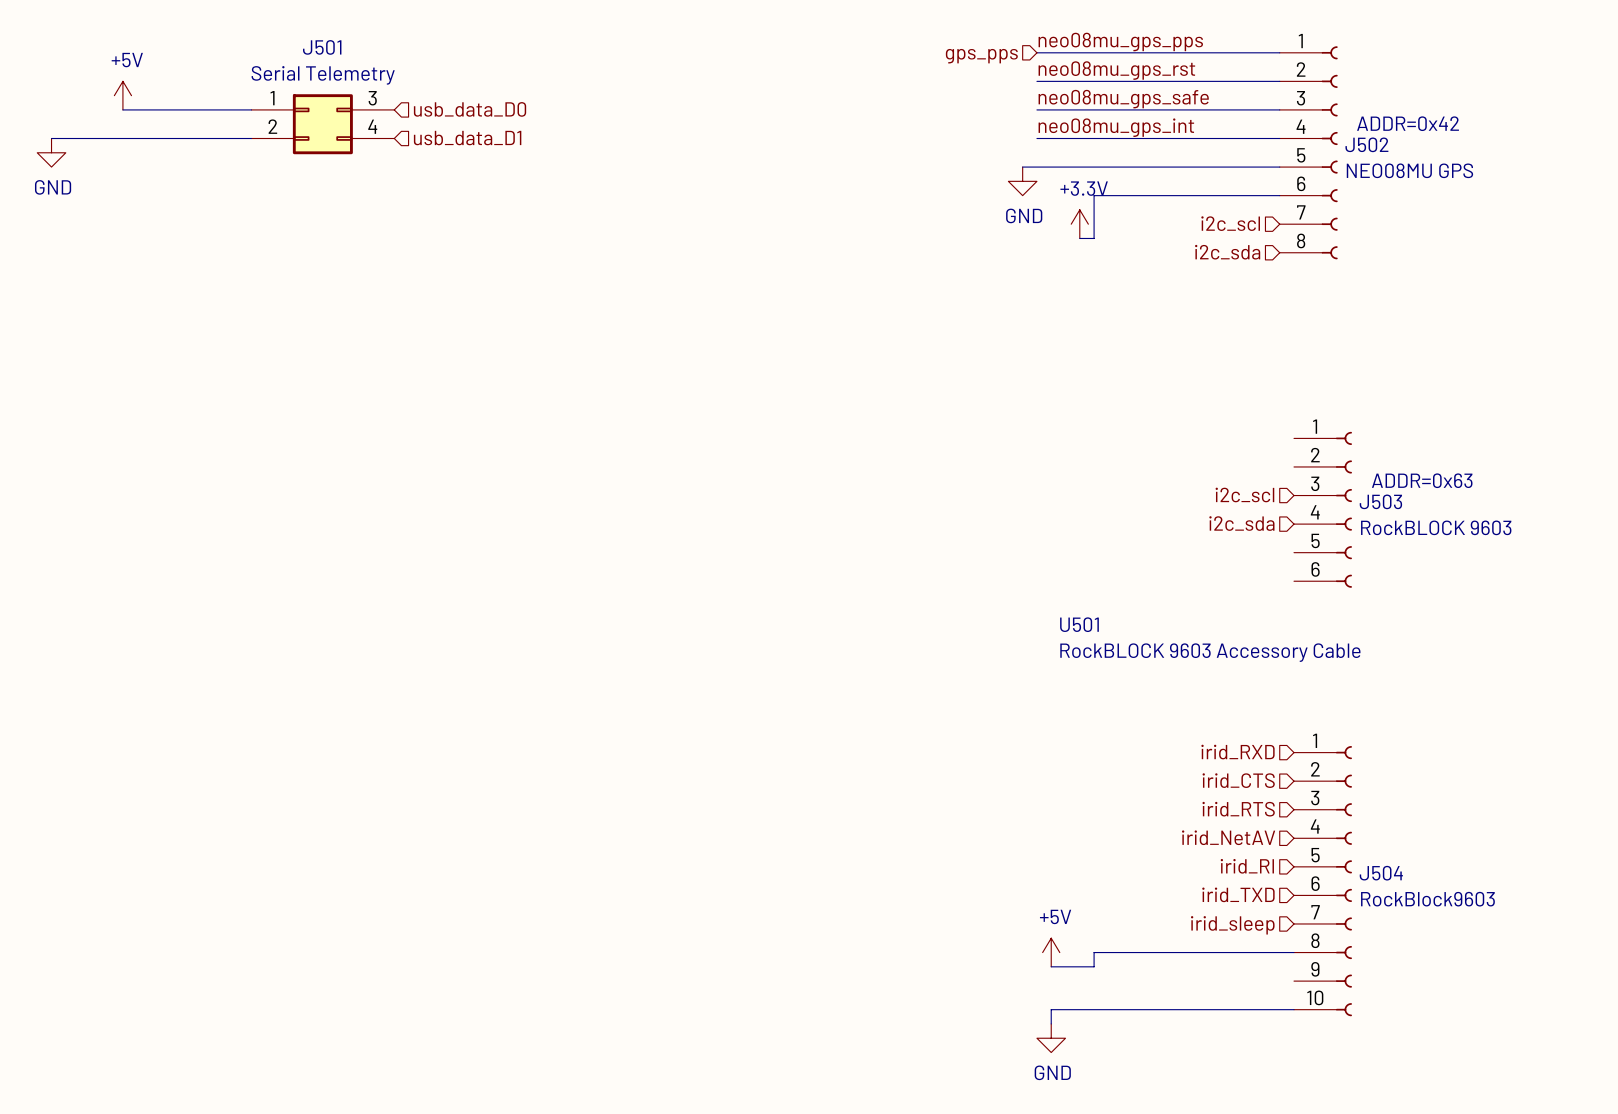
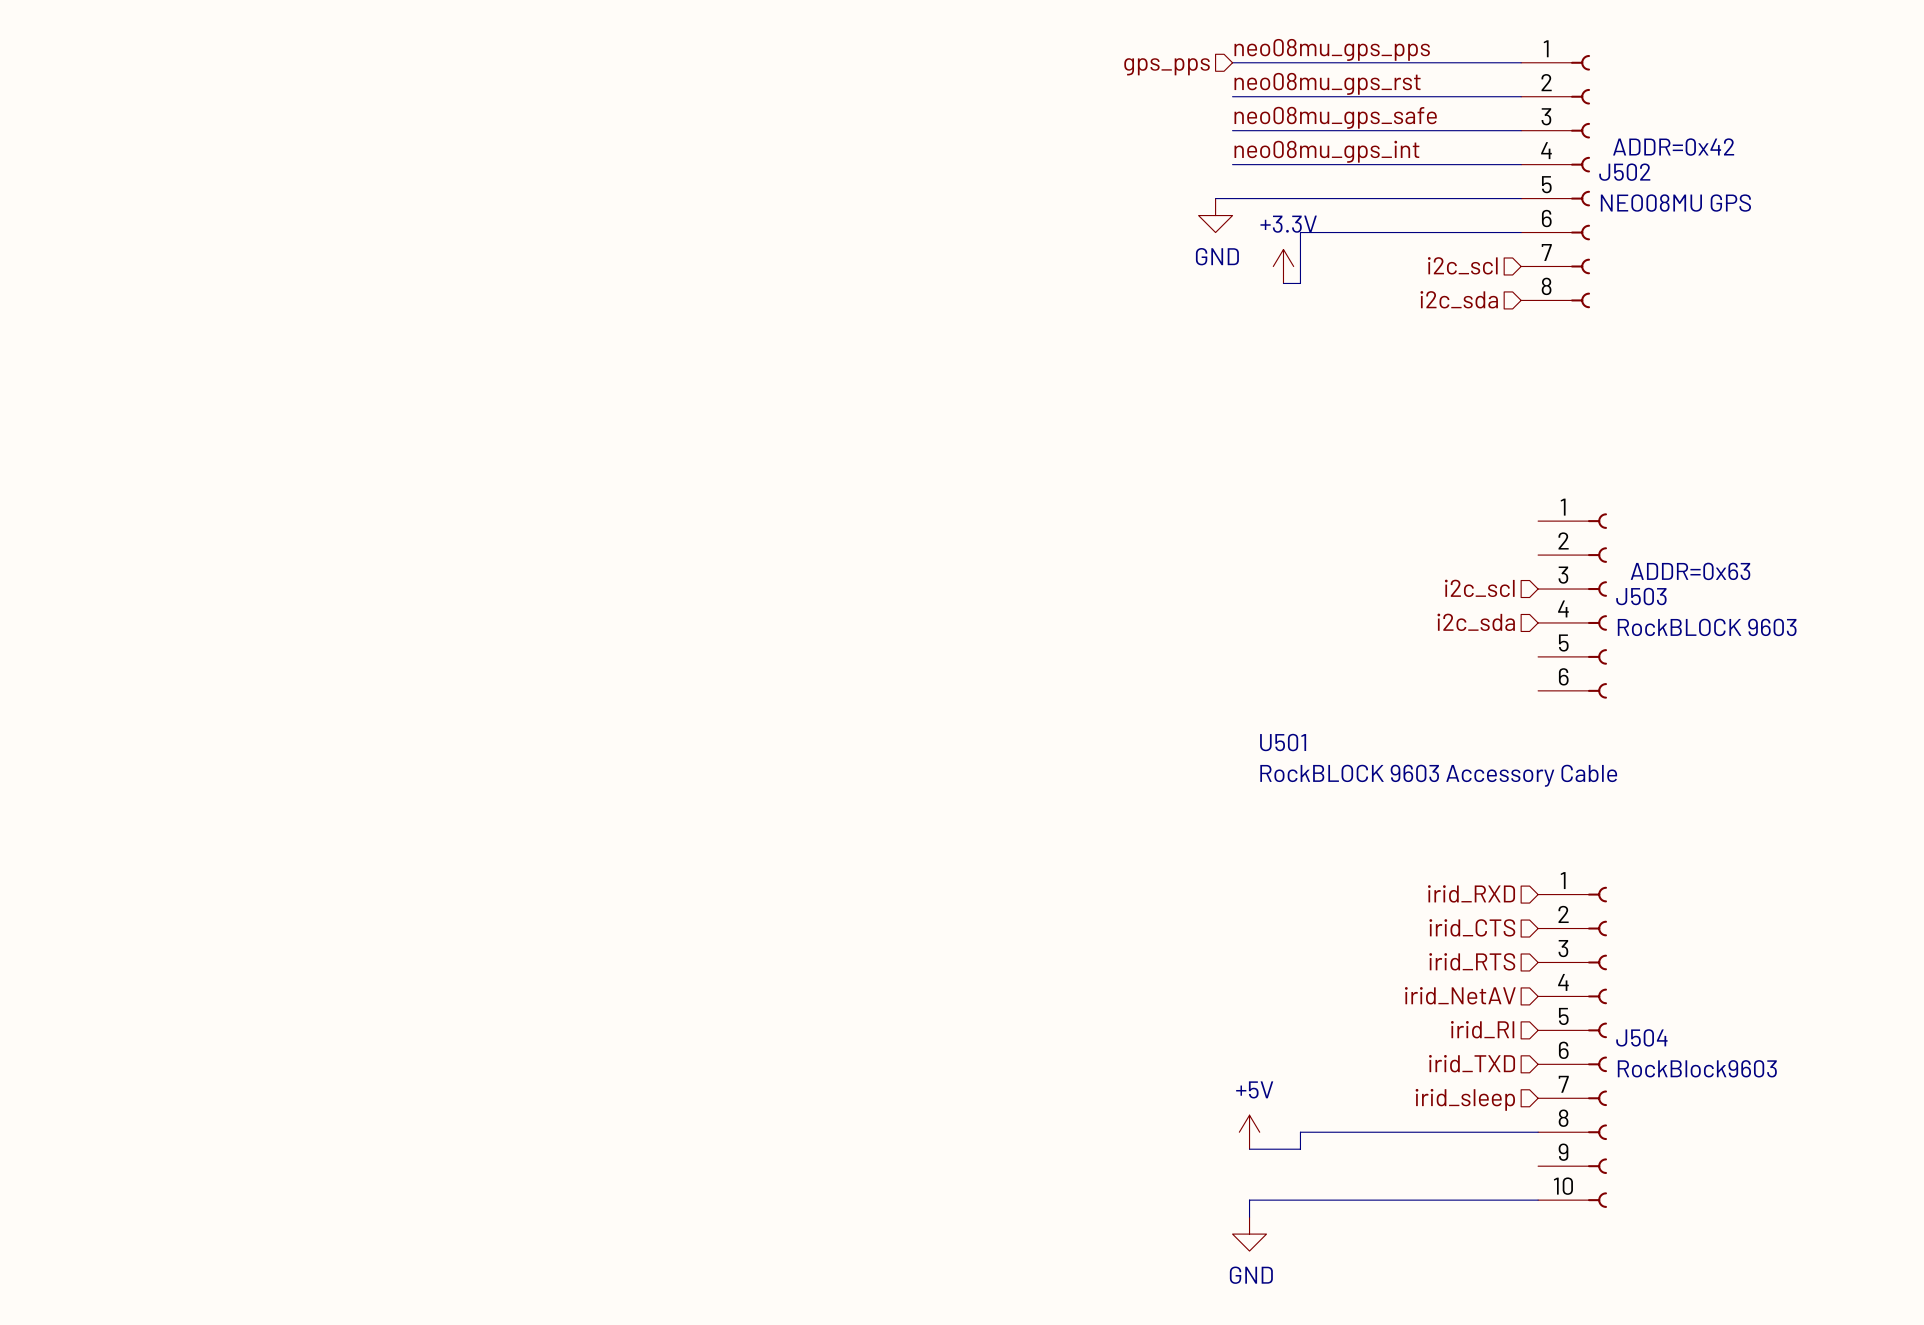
power symbol: +5V (122, 95) -> none
wire: (122, 109) (251, 109) -> none
hierarchical label: usb_data_D0 (470, 109) -> none
J501: Serial Telemetry (322, 124) -> none
wire: (51, 138) (251, 138) -> none
hierarchical label: usb_data_D1 (467, 138) -> none
power symbol: GND (51, 152) -> none

